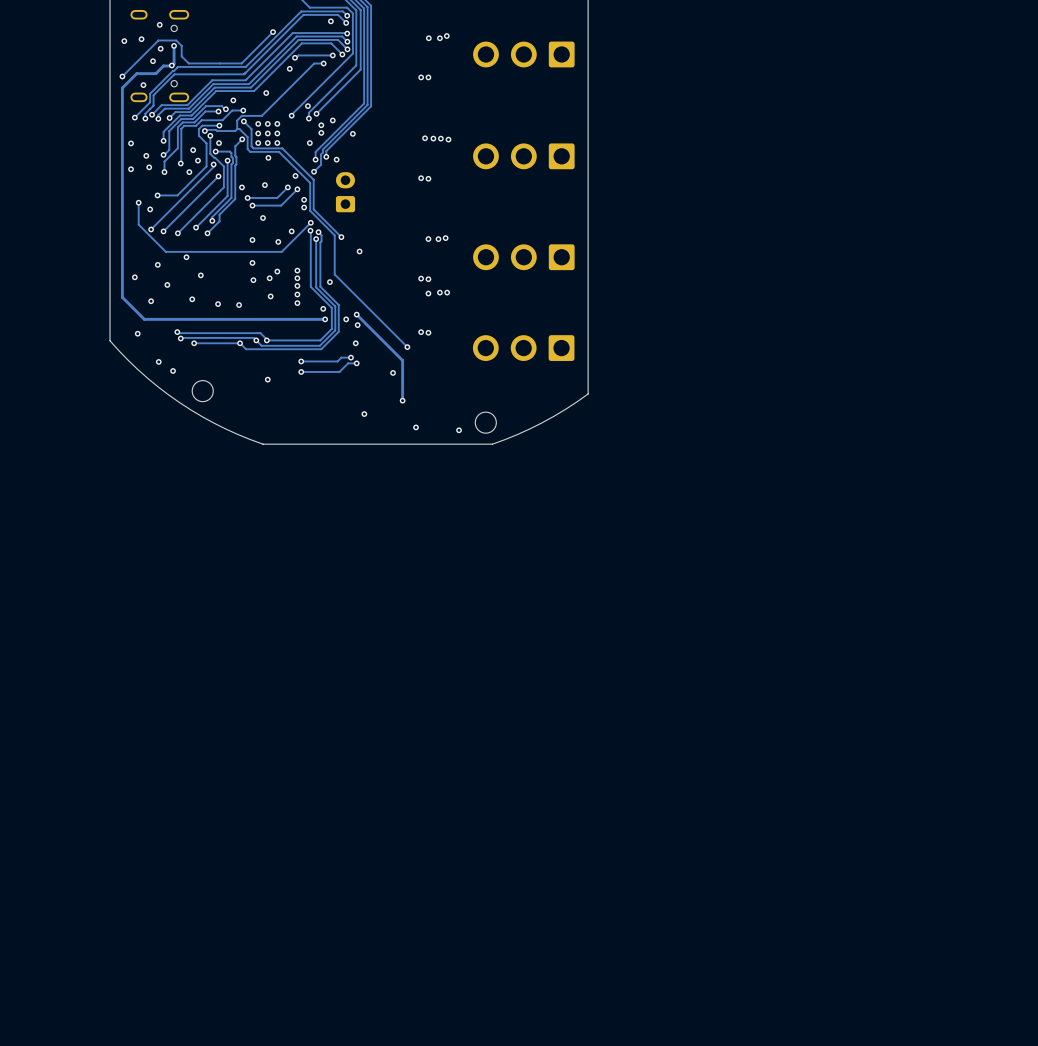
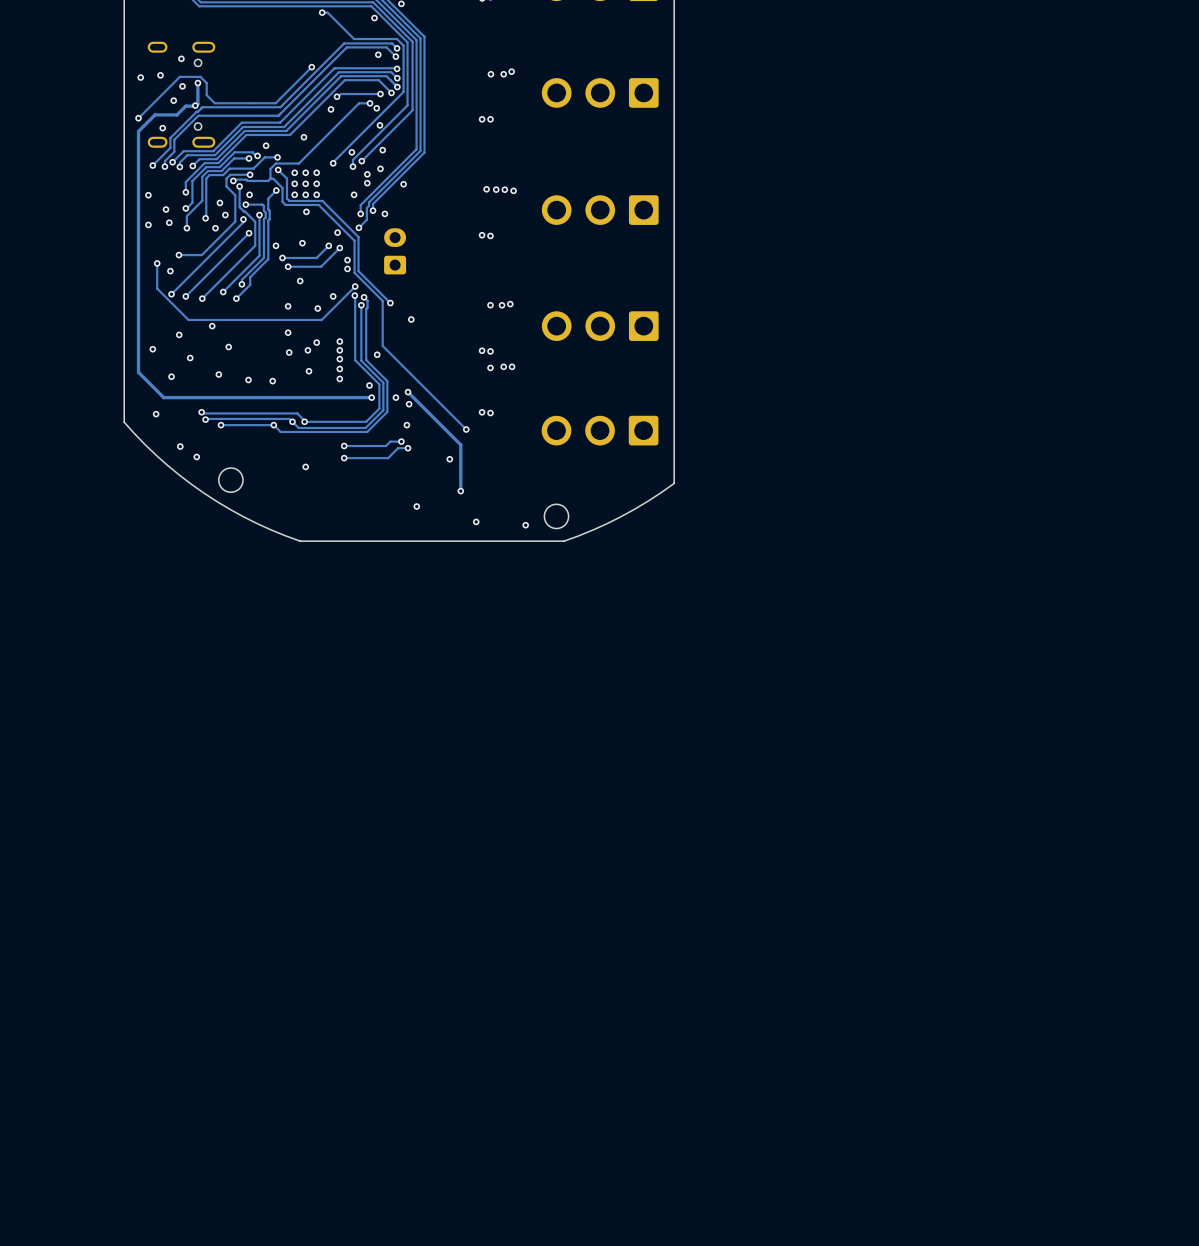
via: none -> (376, 108)
via: none -> (379, 125)
via: none -> (382, 150)

